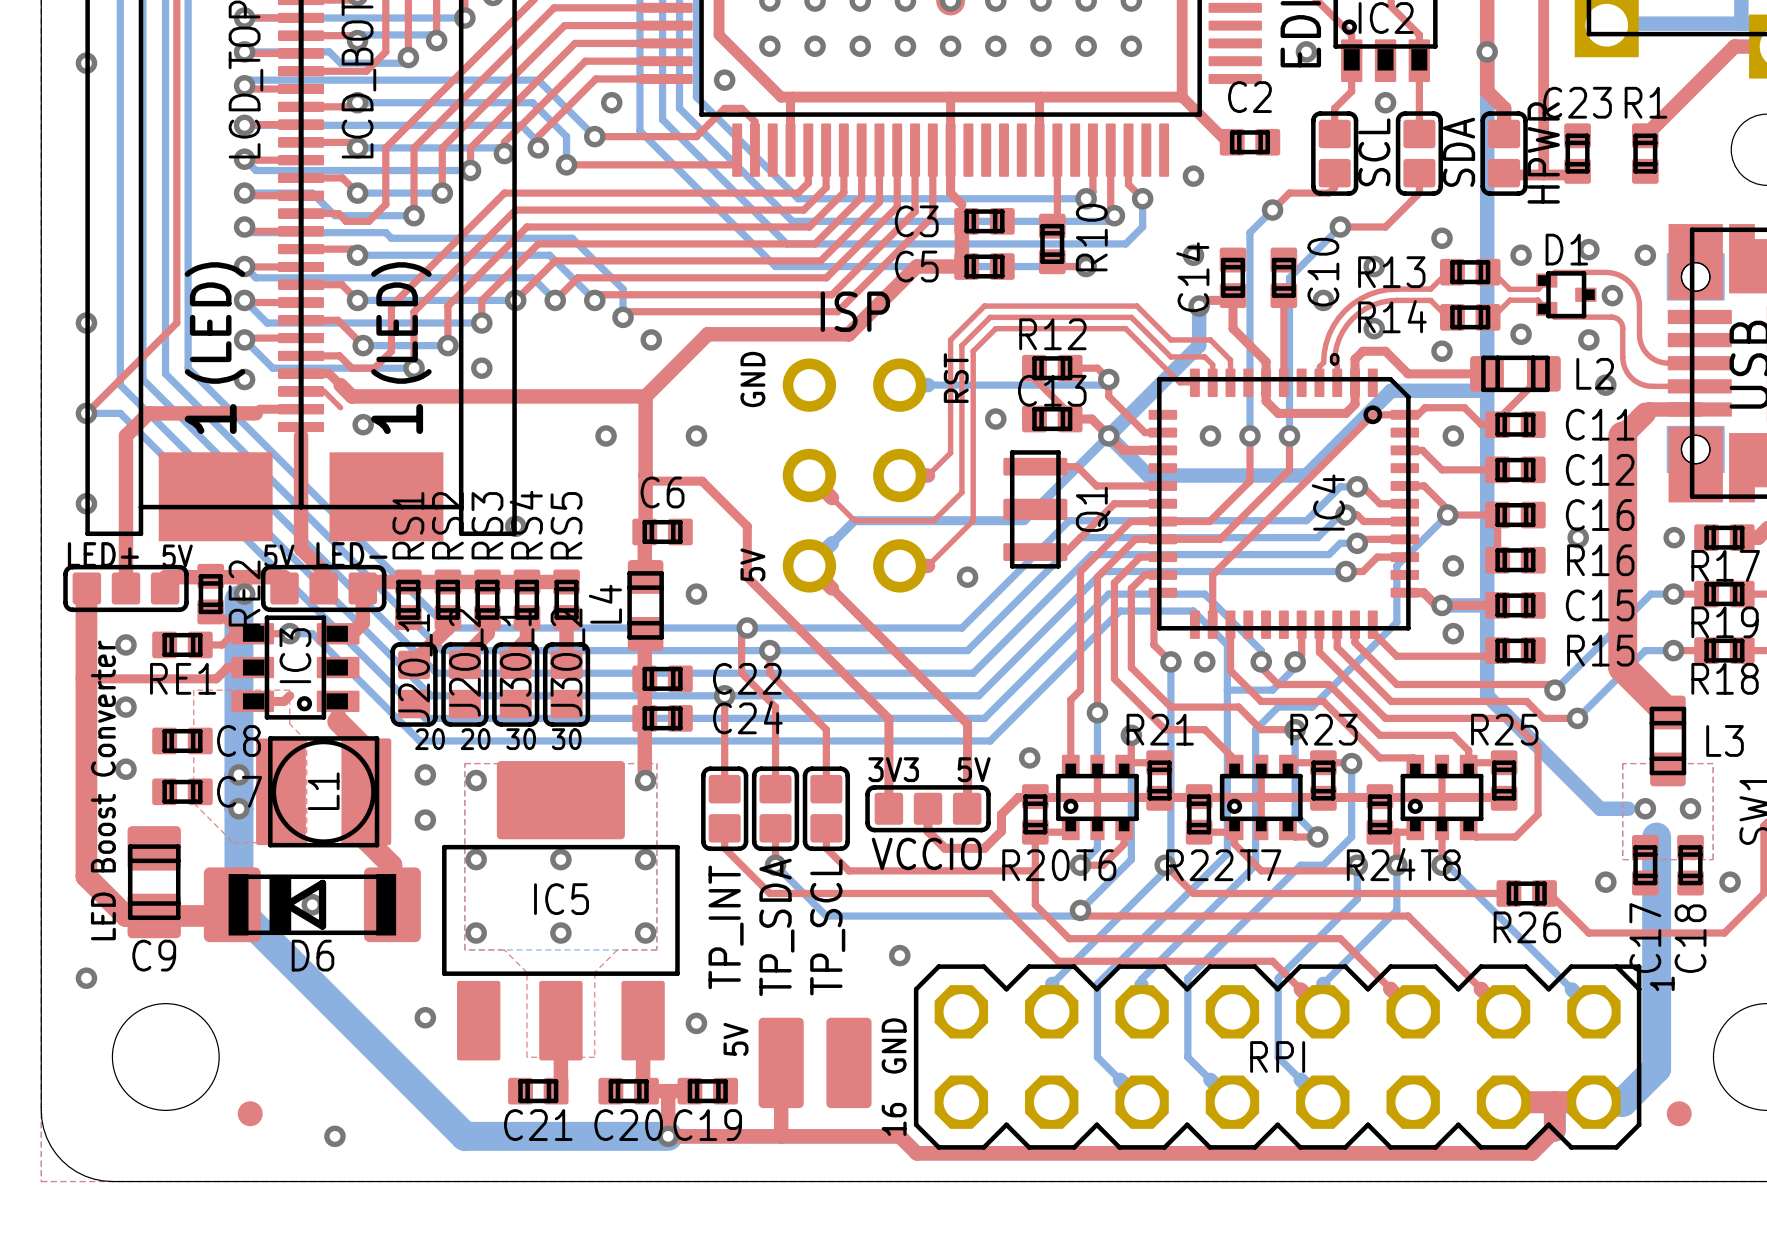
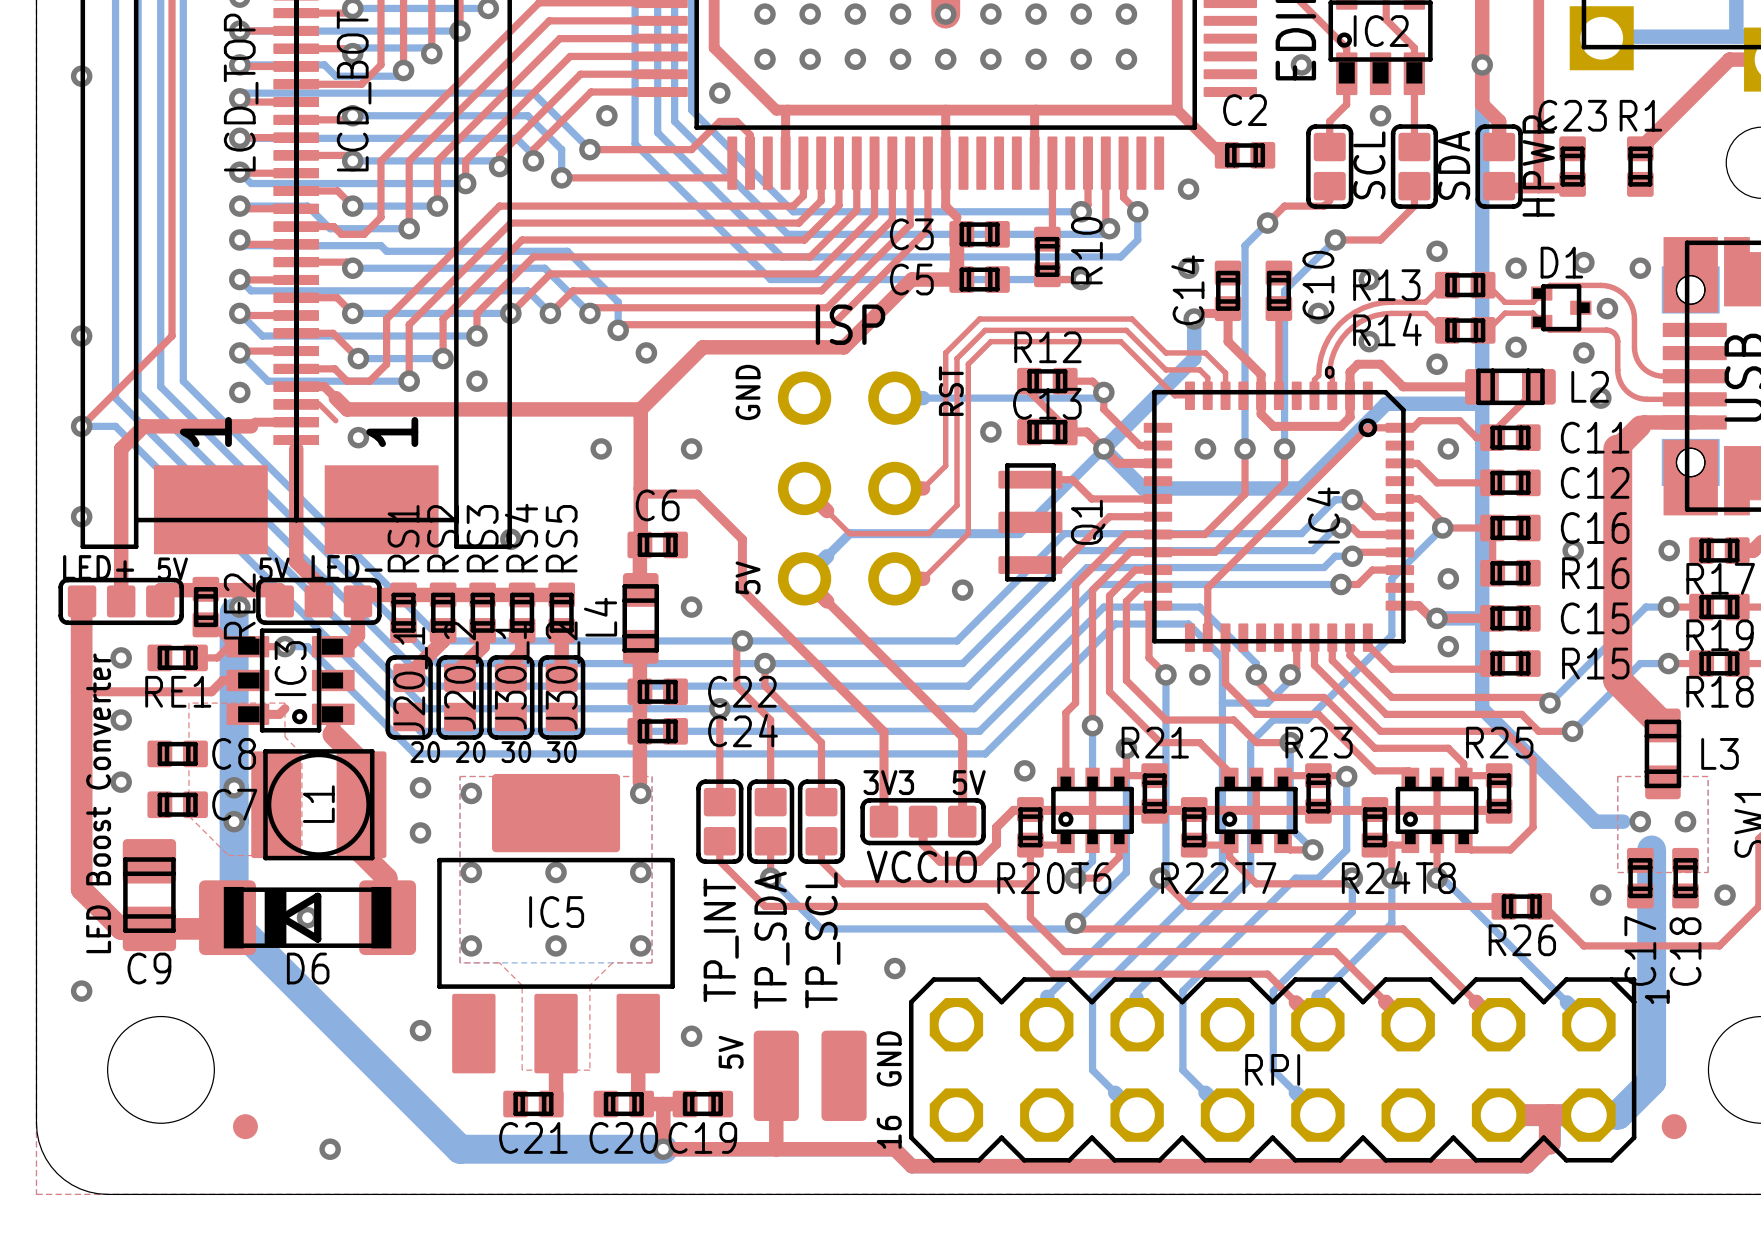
text: (LED) (215, 323) -> none
text: (LED) (401, 323) -> none

